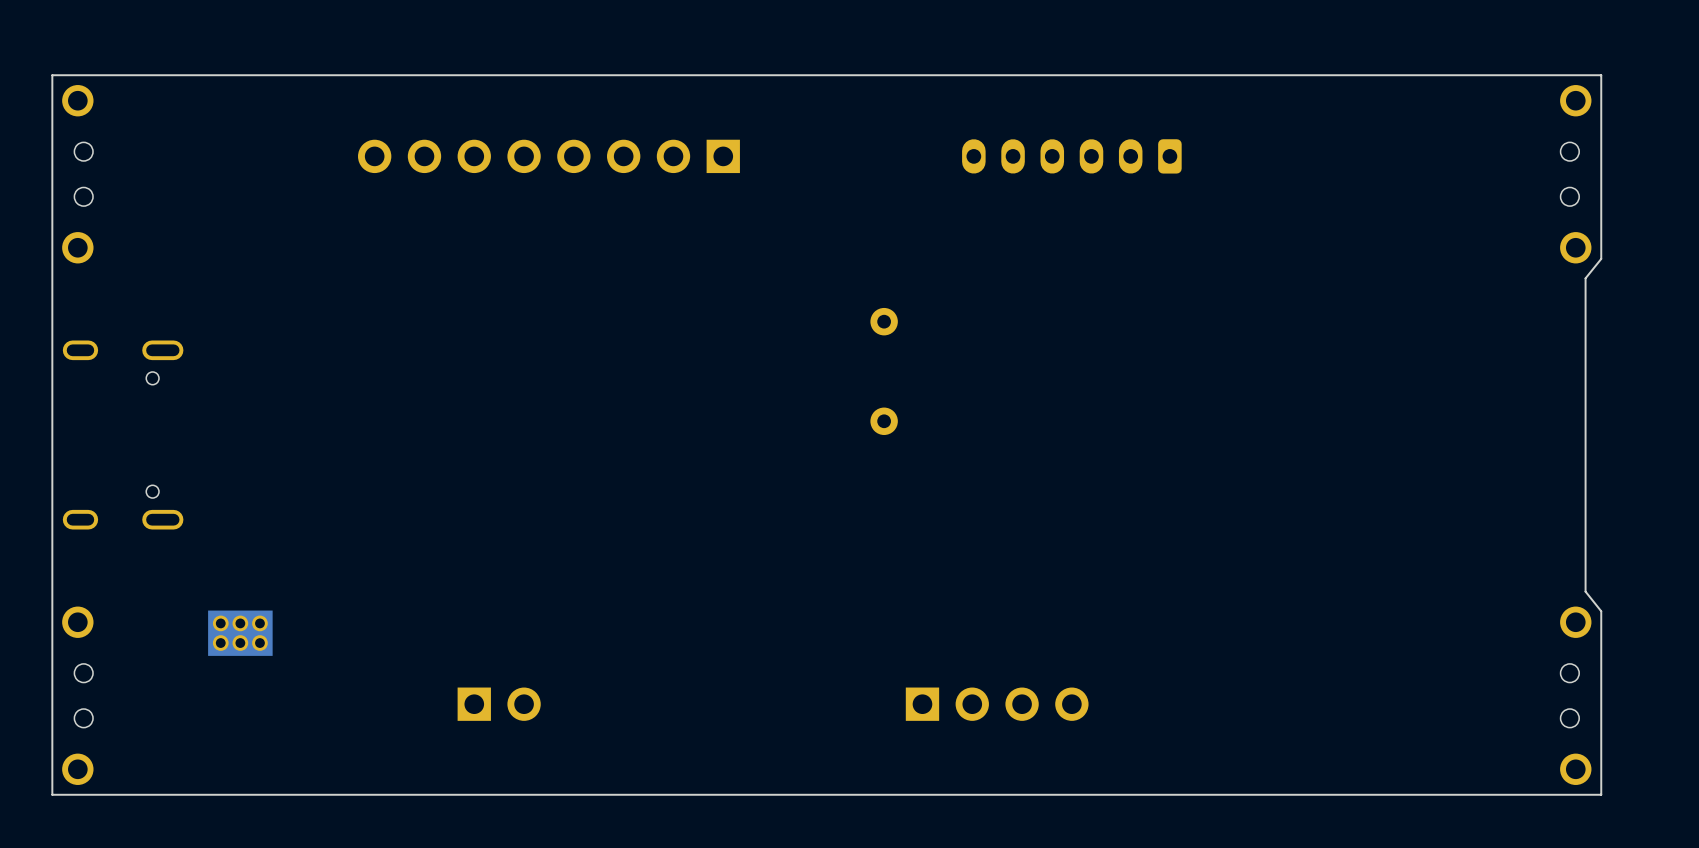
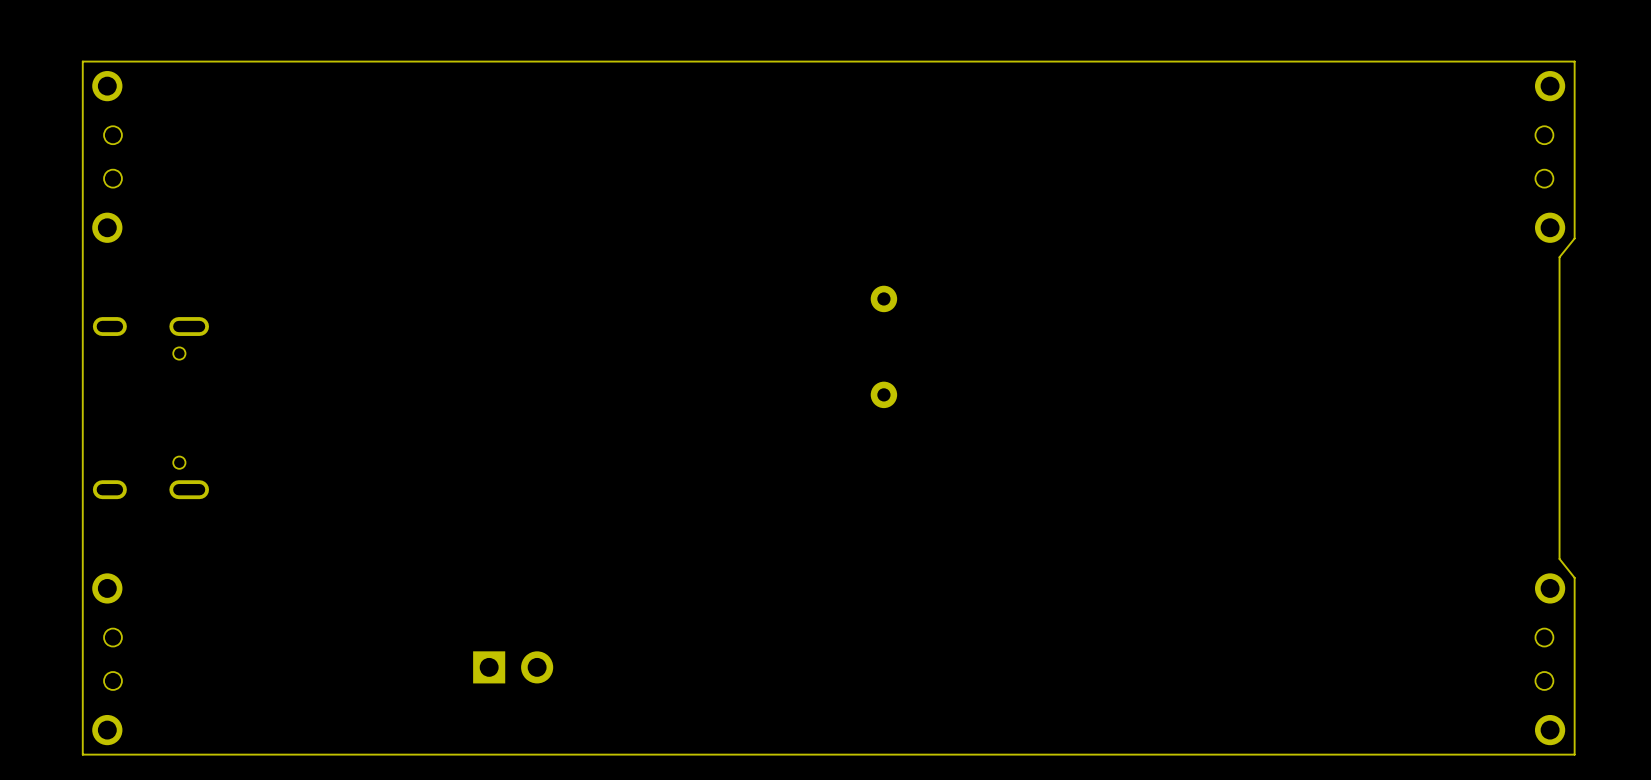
part: (548, 156) -> none
part: (1071, 156) -> none
part: (240, 633) -> none
part: (997, 704) -> none

